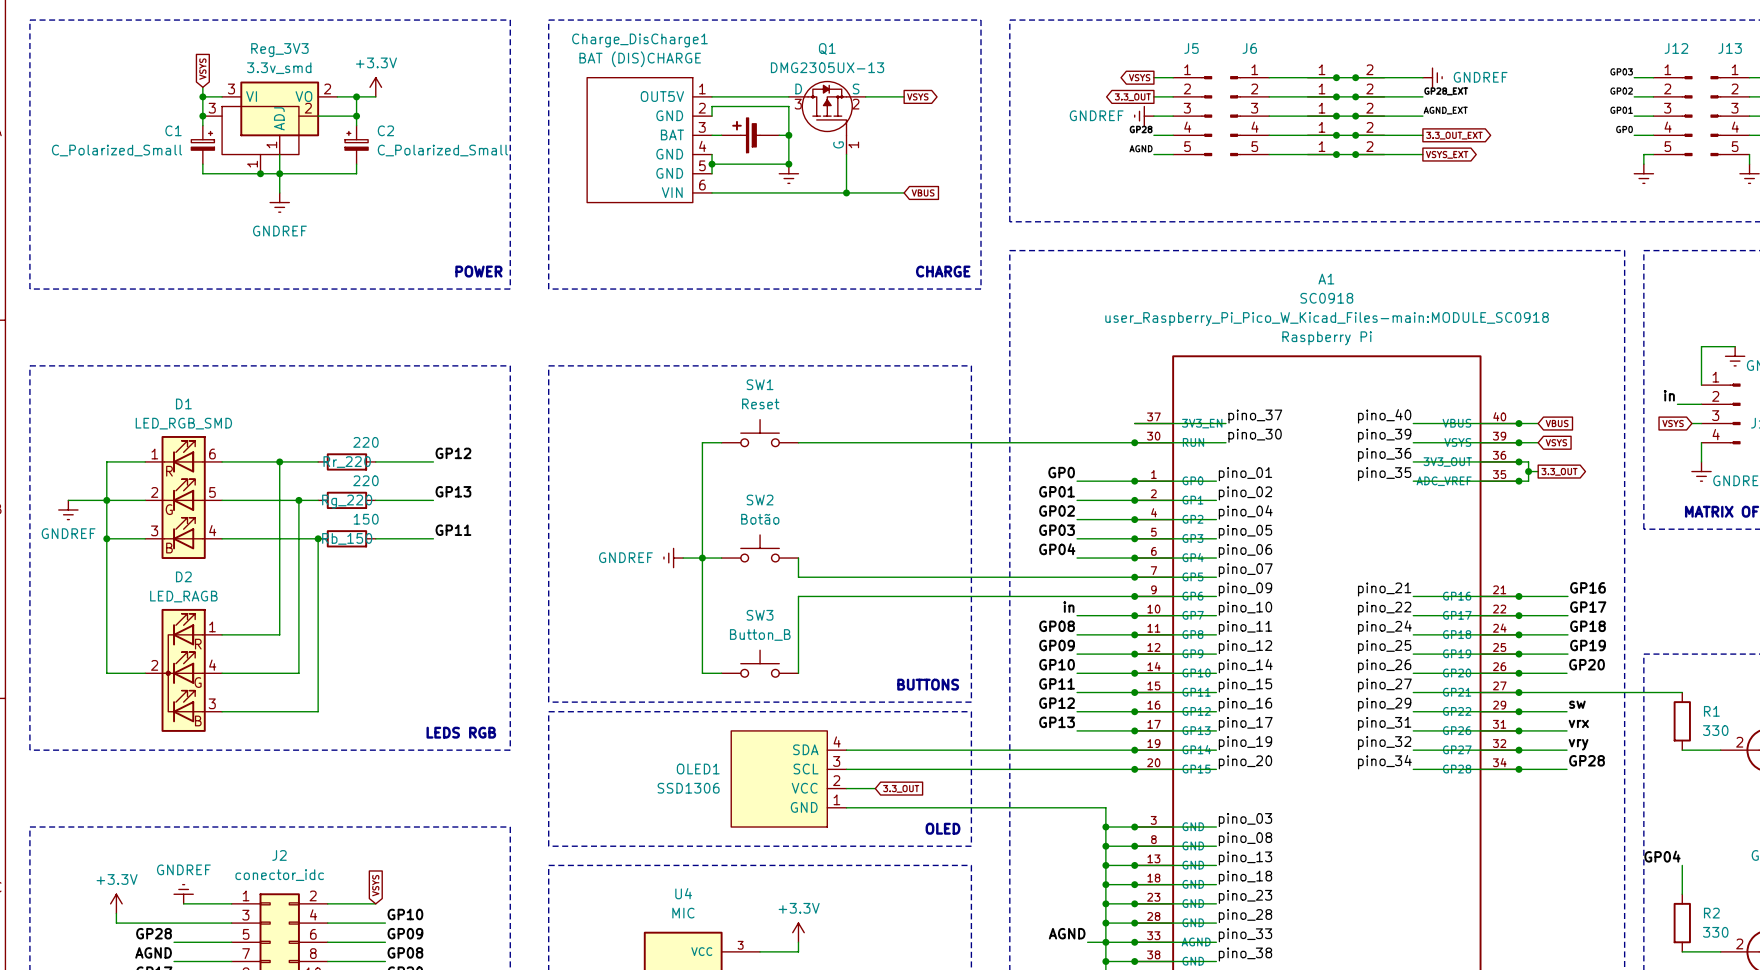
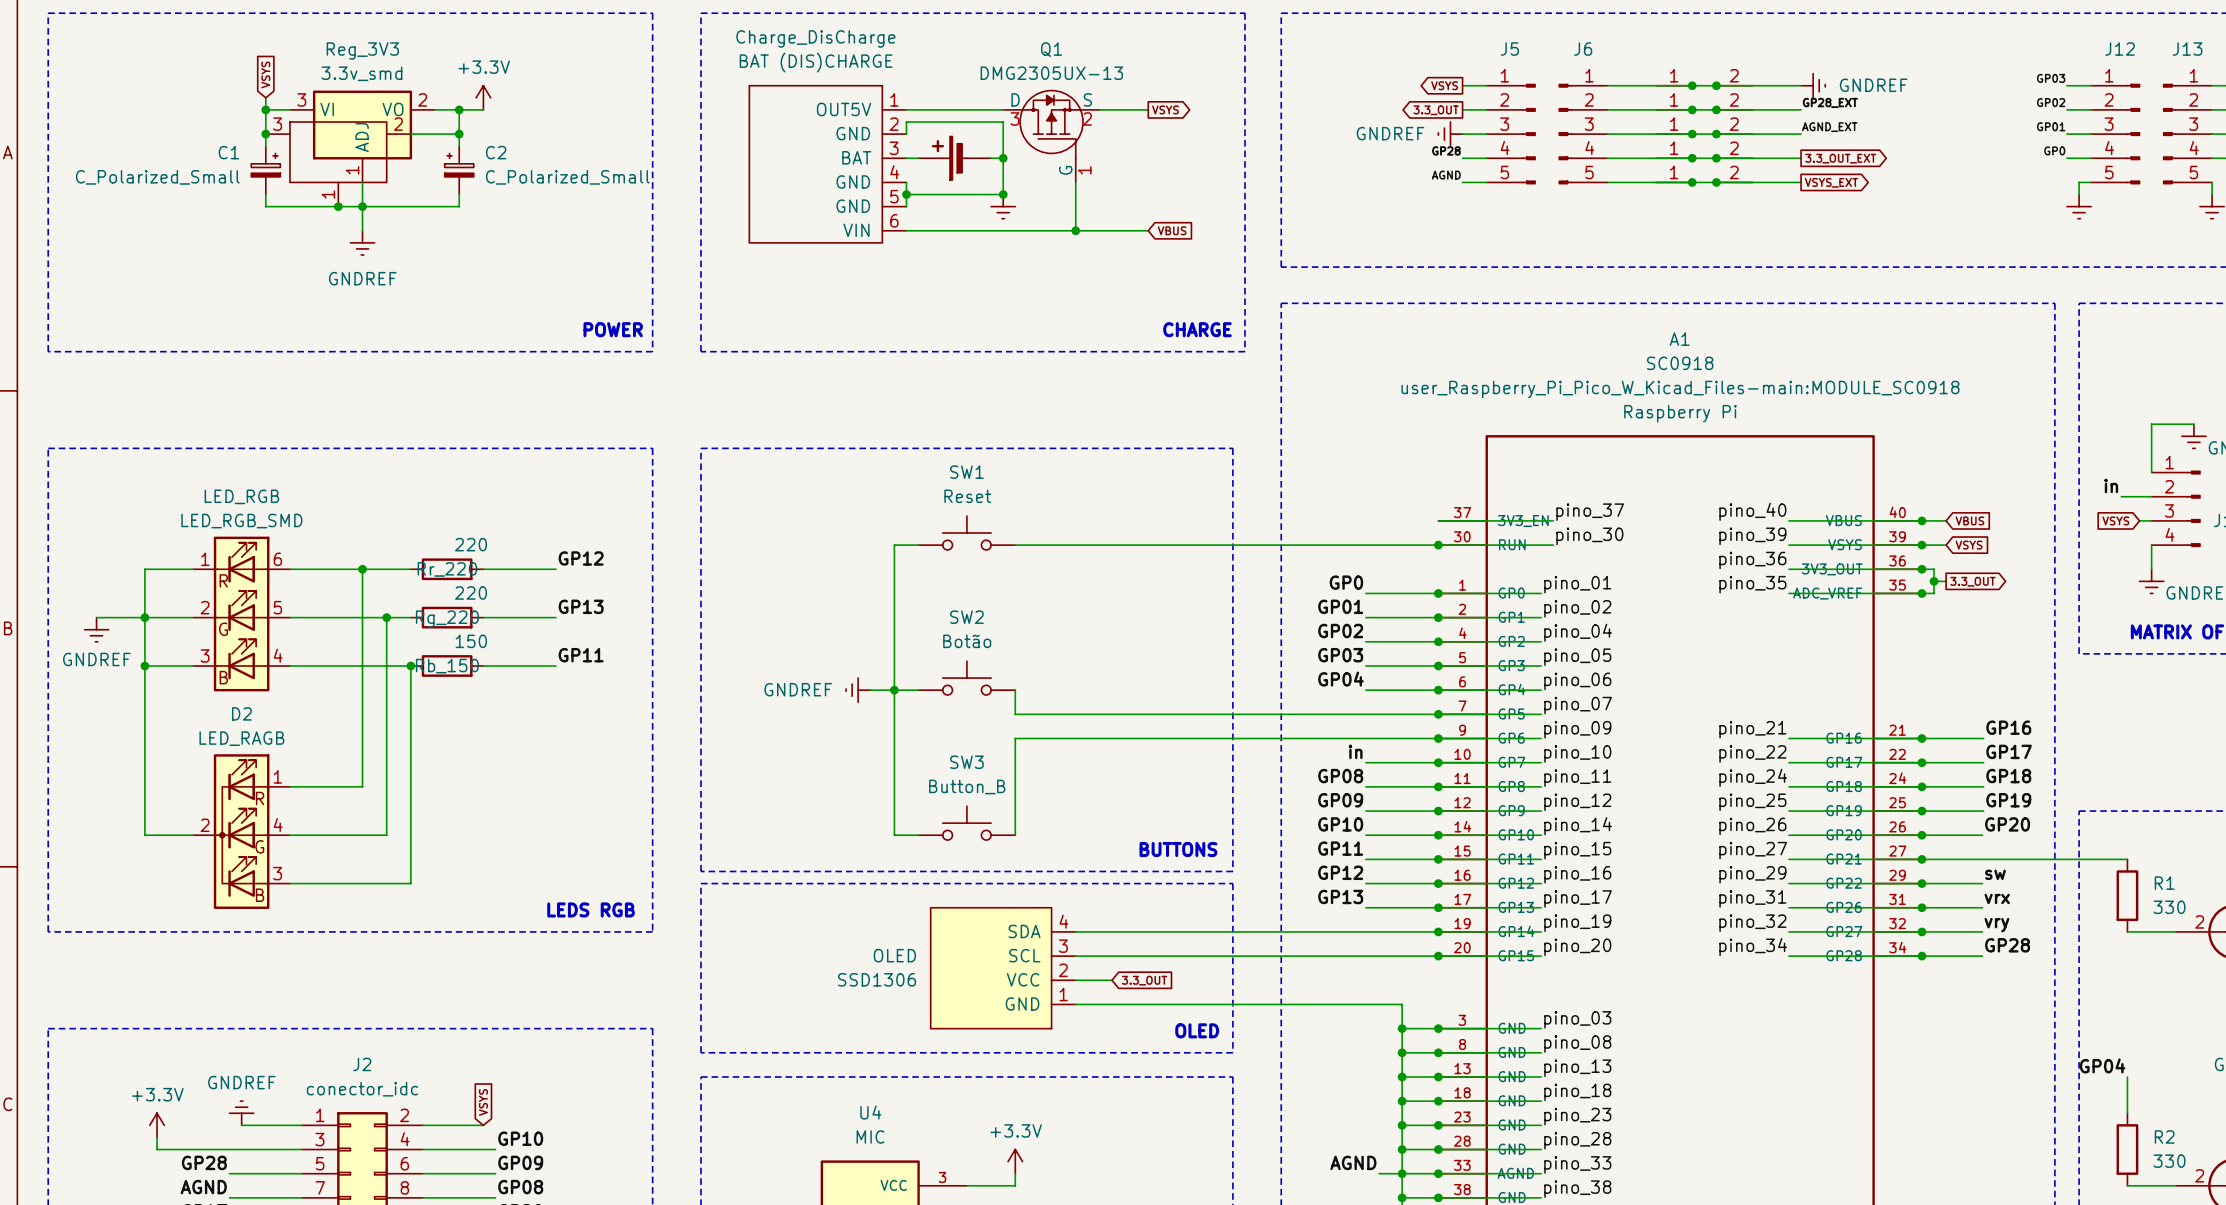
Charge_DisCharge1 name: Charge_DisCharge1 (639, 40) -> Charge_DisCharge (815, 38)
D1 name: D1 (183, 403) -> LED_RGB (241, 496)
OLED1 name: OLED1 (698, 769) -> OLED (894, 955)

